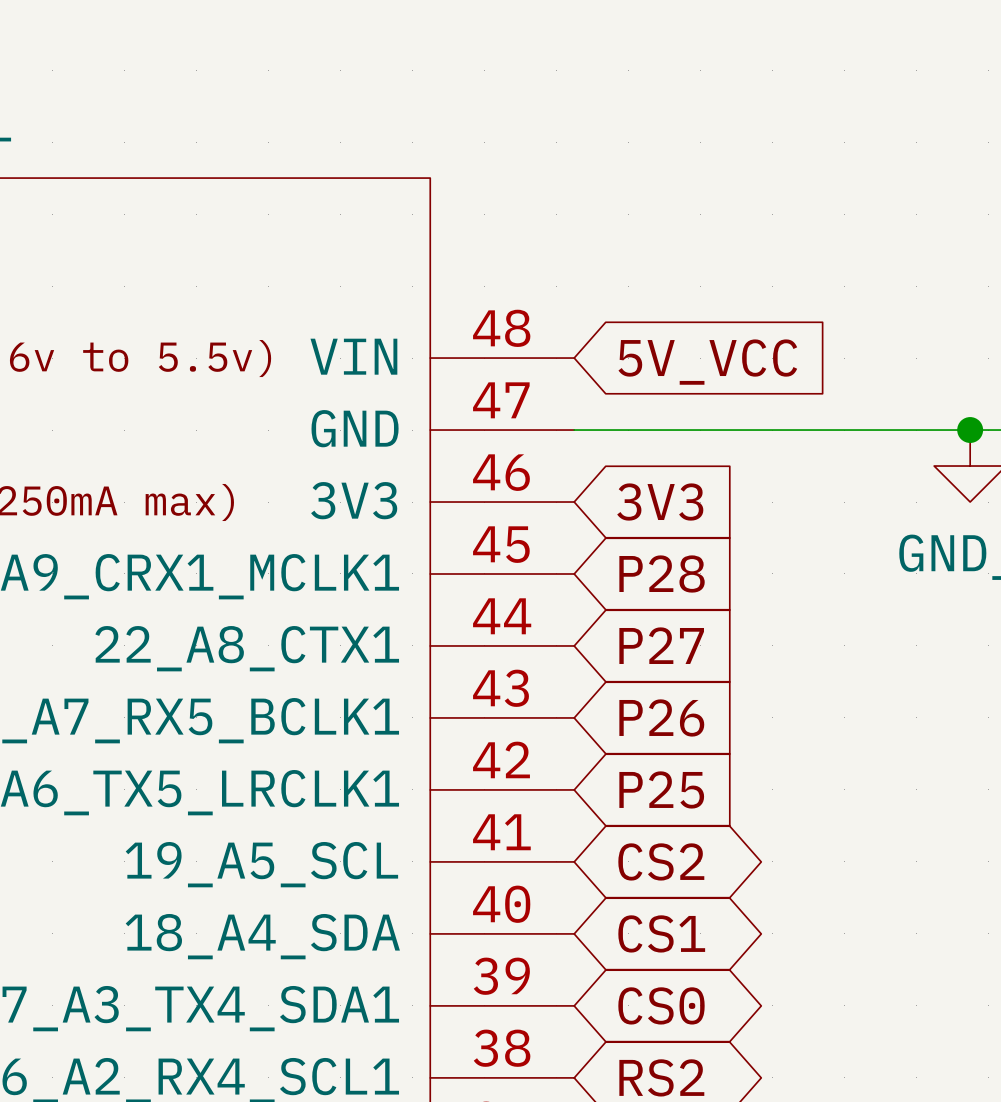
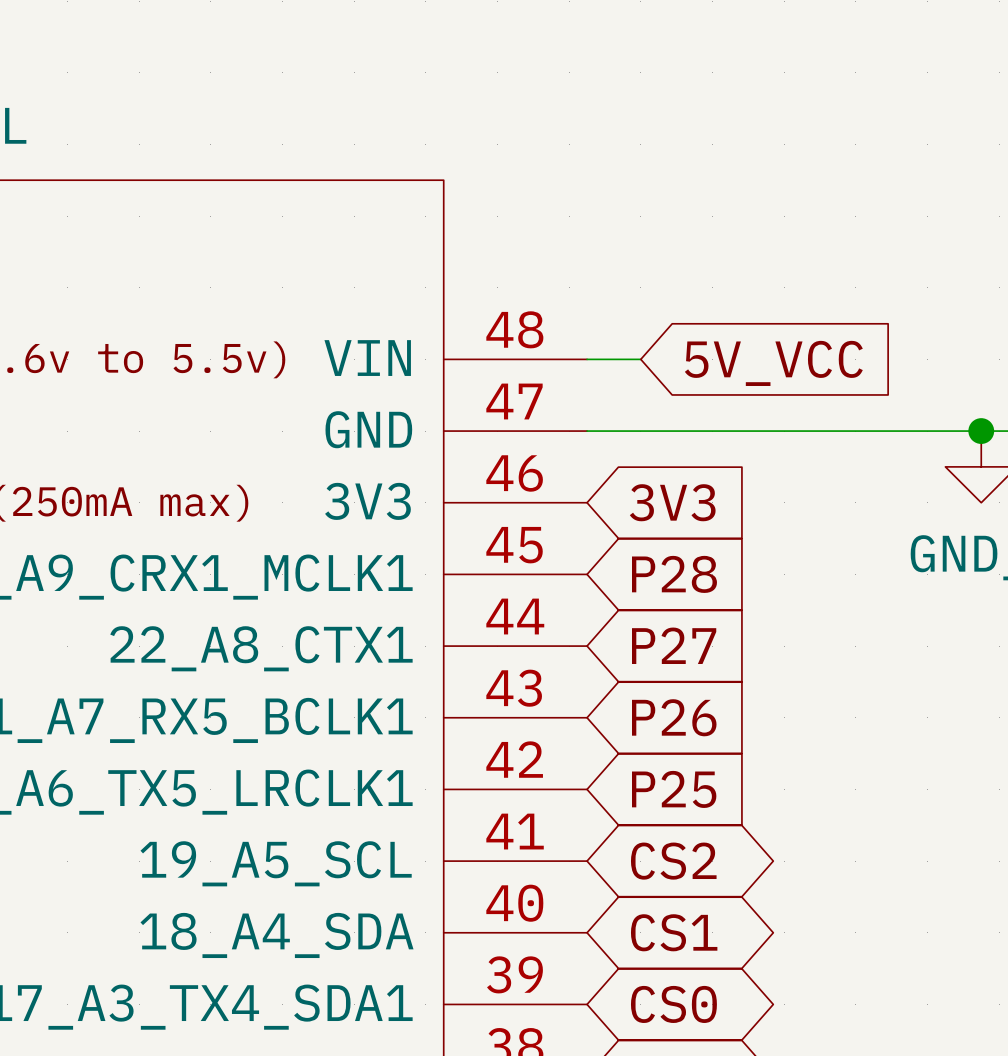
wire: none -> (587, 359) (640, 359)
global label position: 5V_VCC (707, 362) -> 5V_VCC (773, 363)

